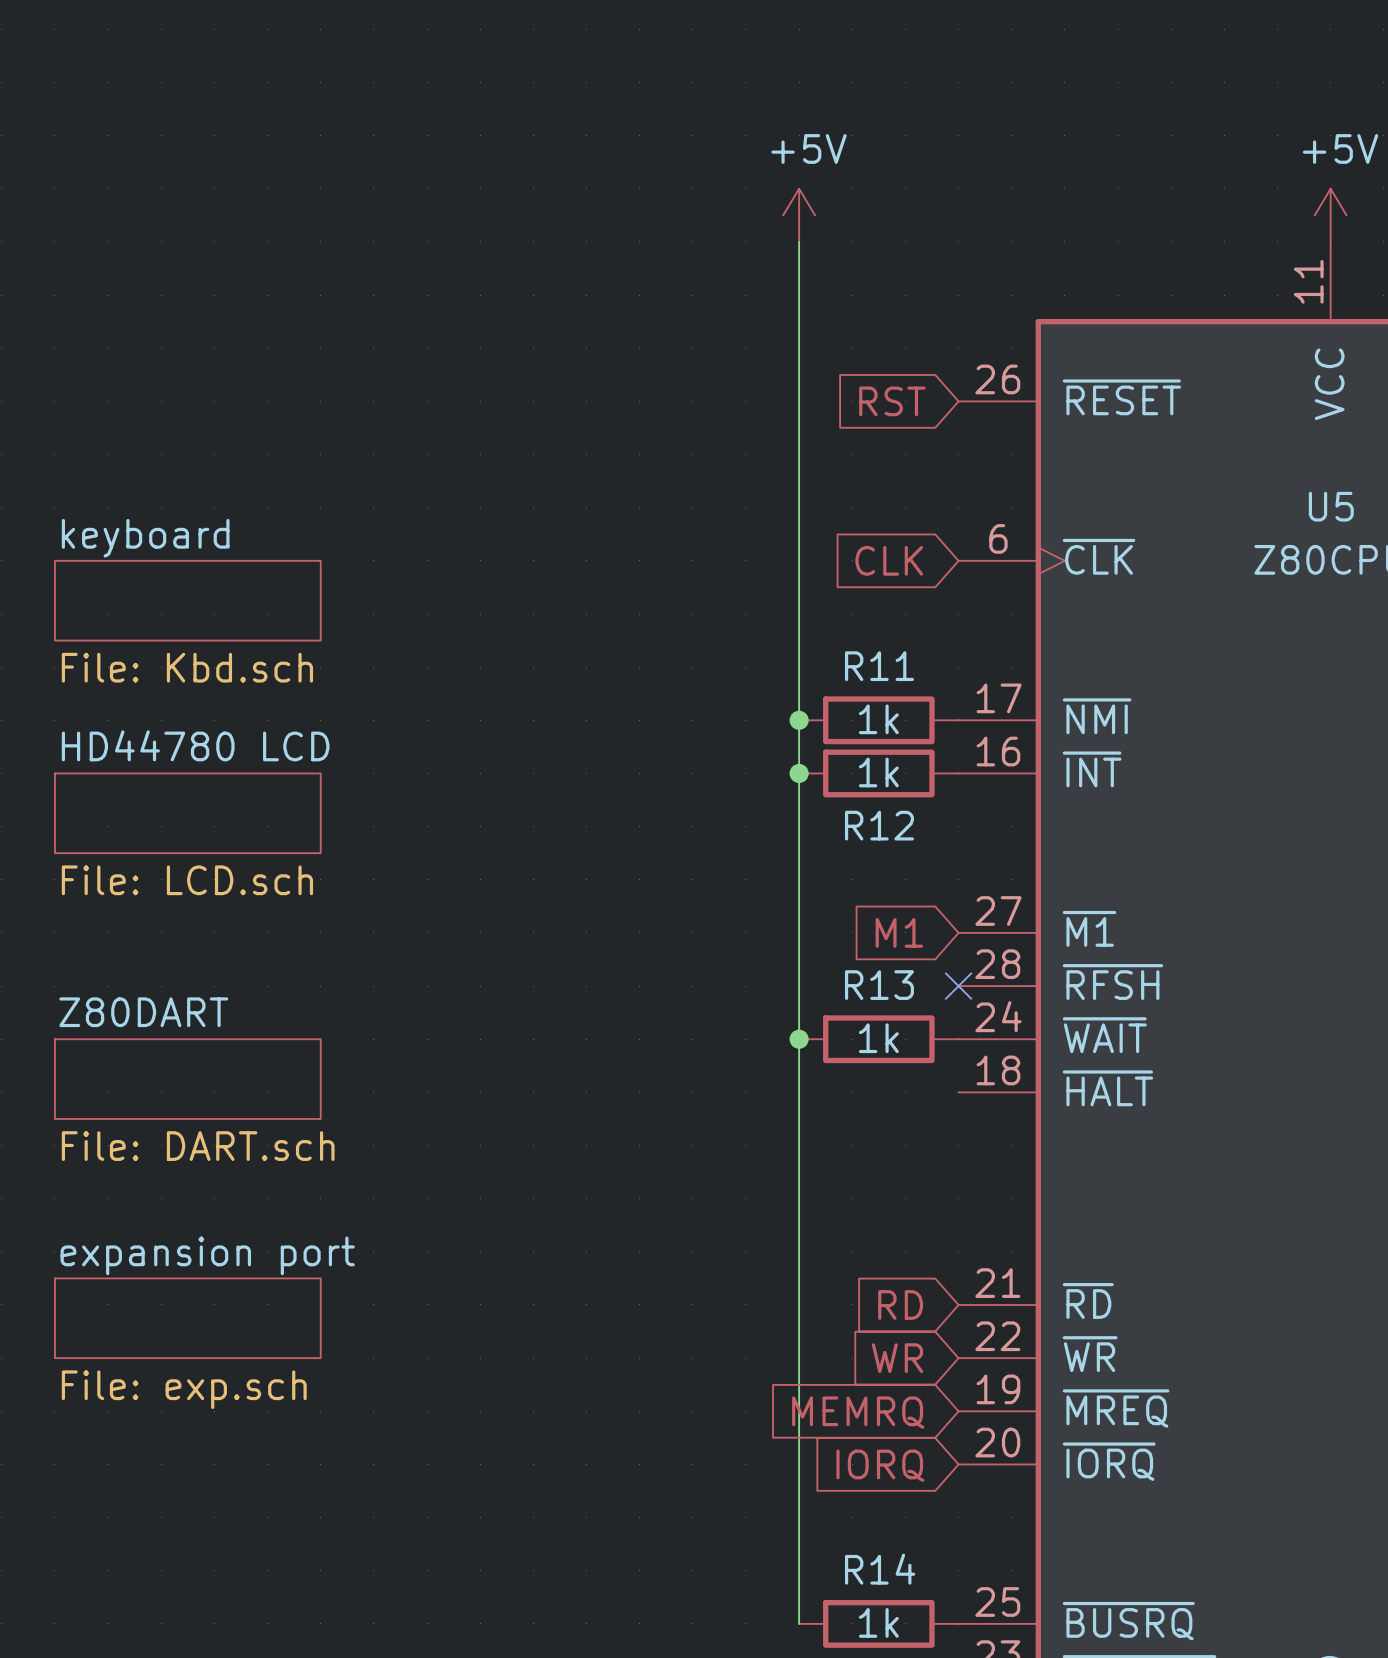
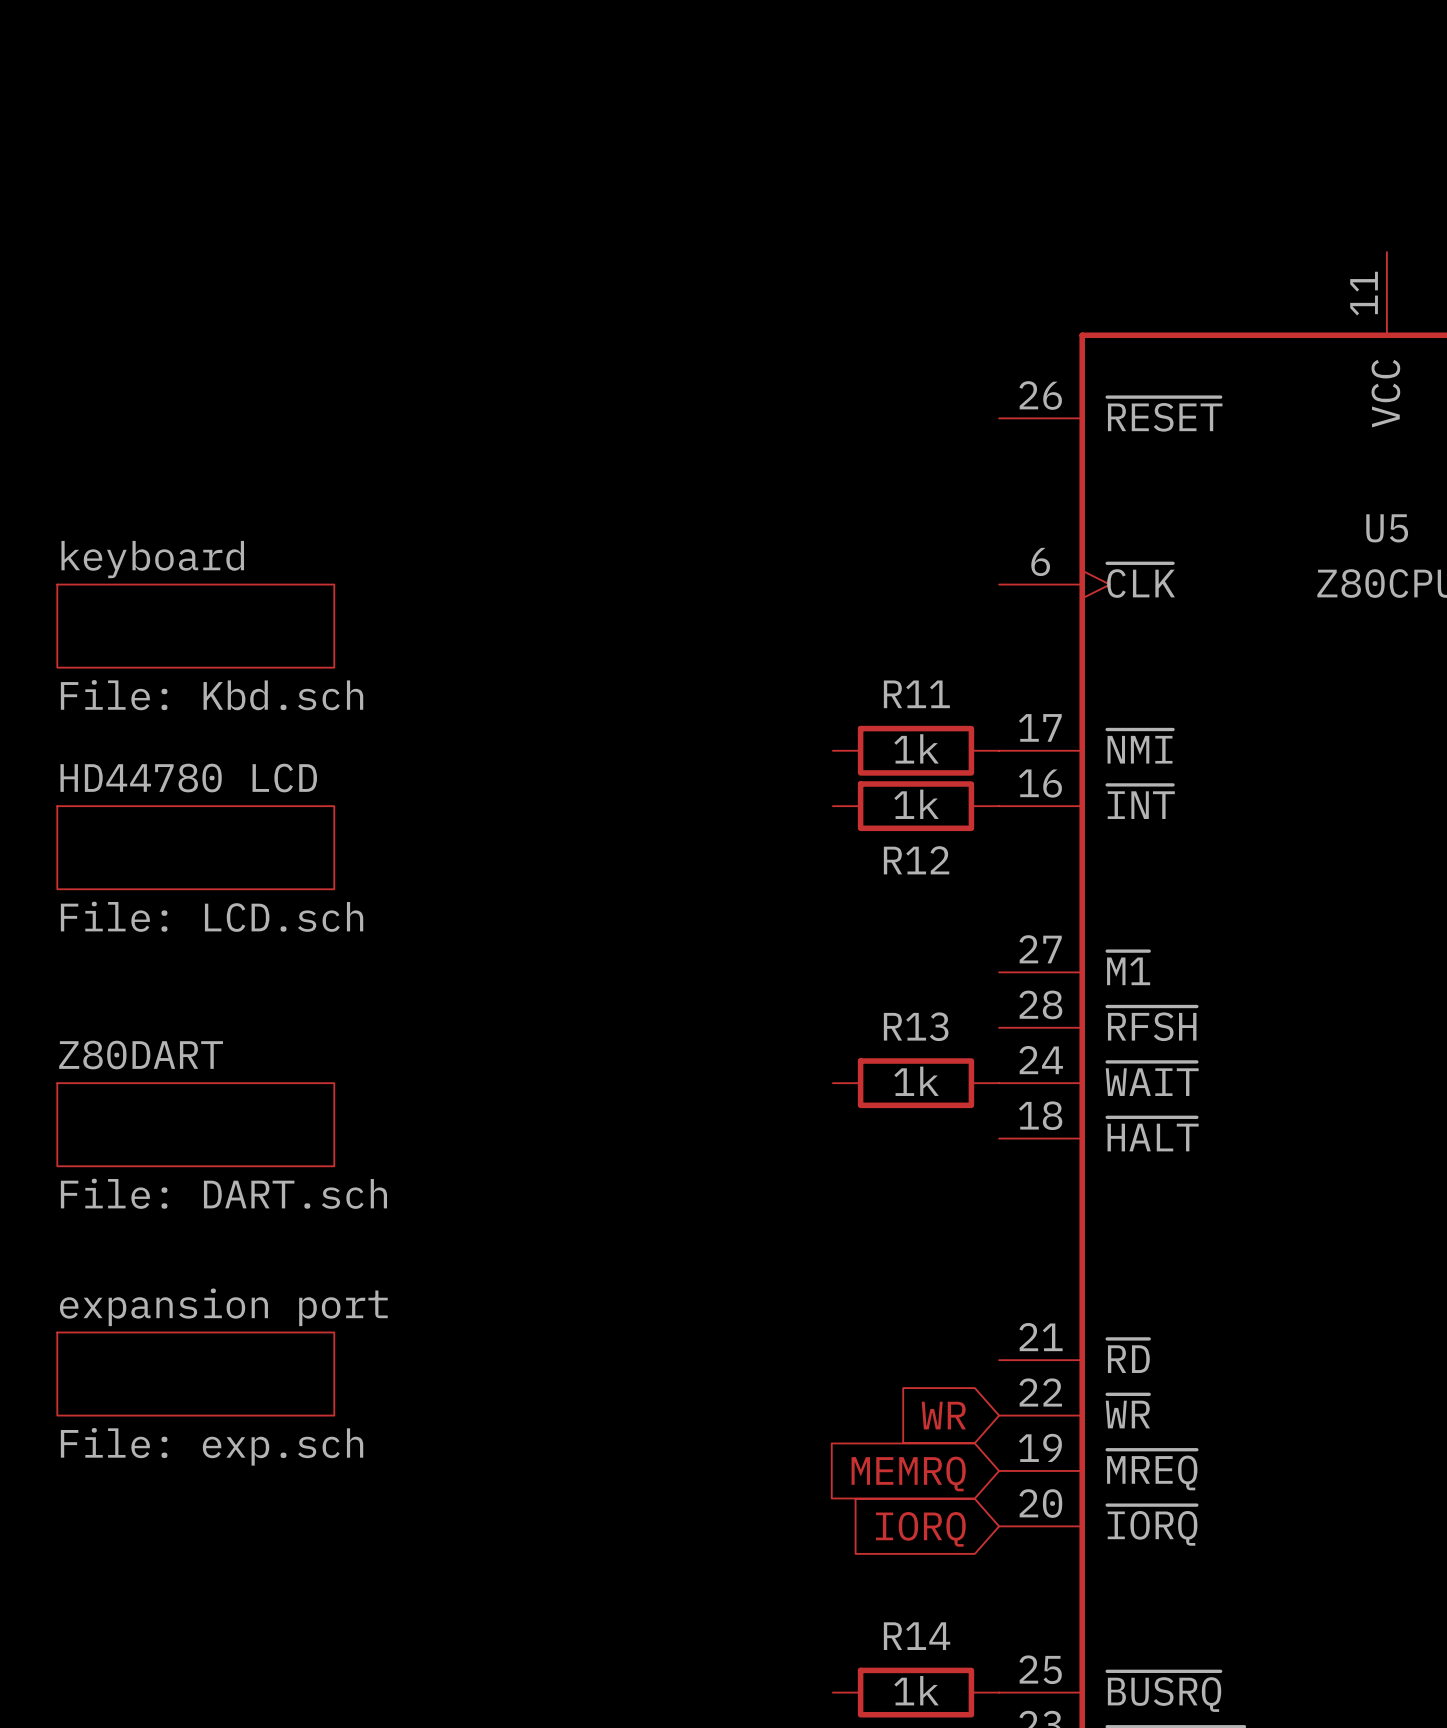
power symbol: +5V (799, 215) -> none
power symbol: +5V (1330, 215) -> none
wire: (799, 241) (799, 1623) -> none
global label: RST (892, 401) -> none
global label: CLK (889, 560) -> none
junction: (799, 720) -> none
junction: (799, 773) -> none
global label: M1 (899, 932) -> none
no-connect mark: (958, 986) -> none
junction: (799, 1039) -> none
global label: RD (900, 1304) -> none

